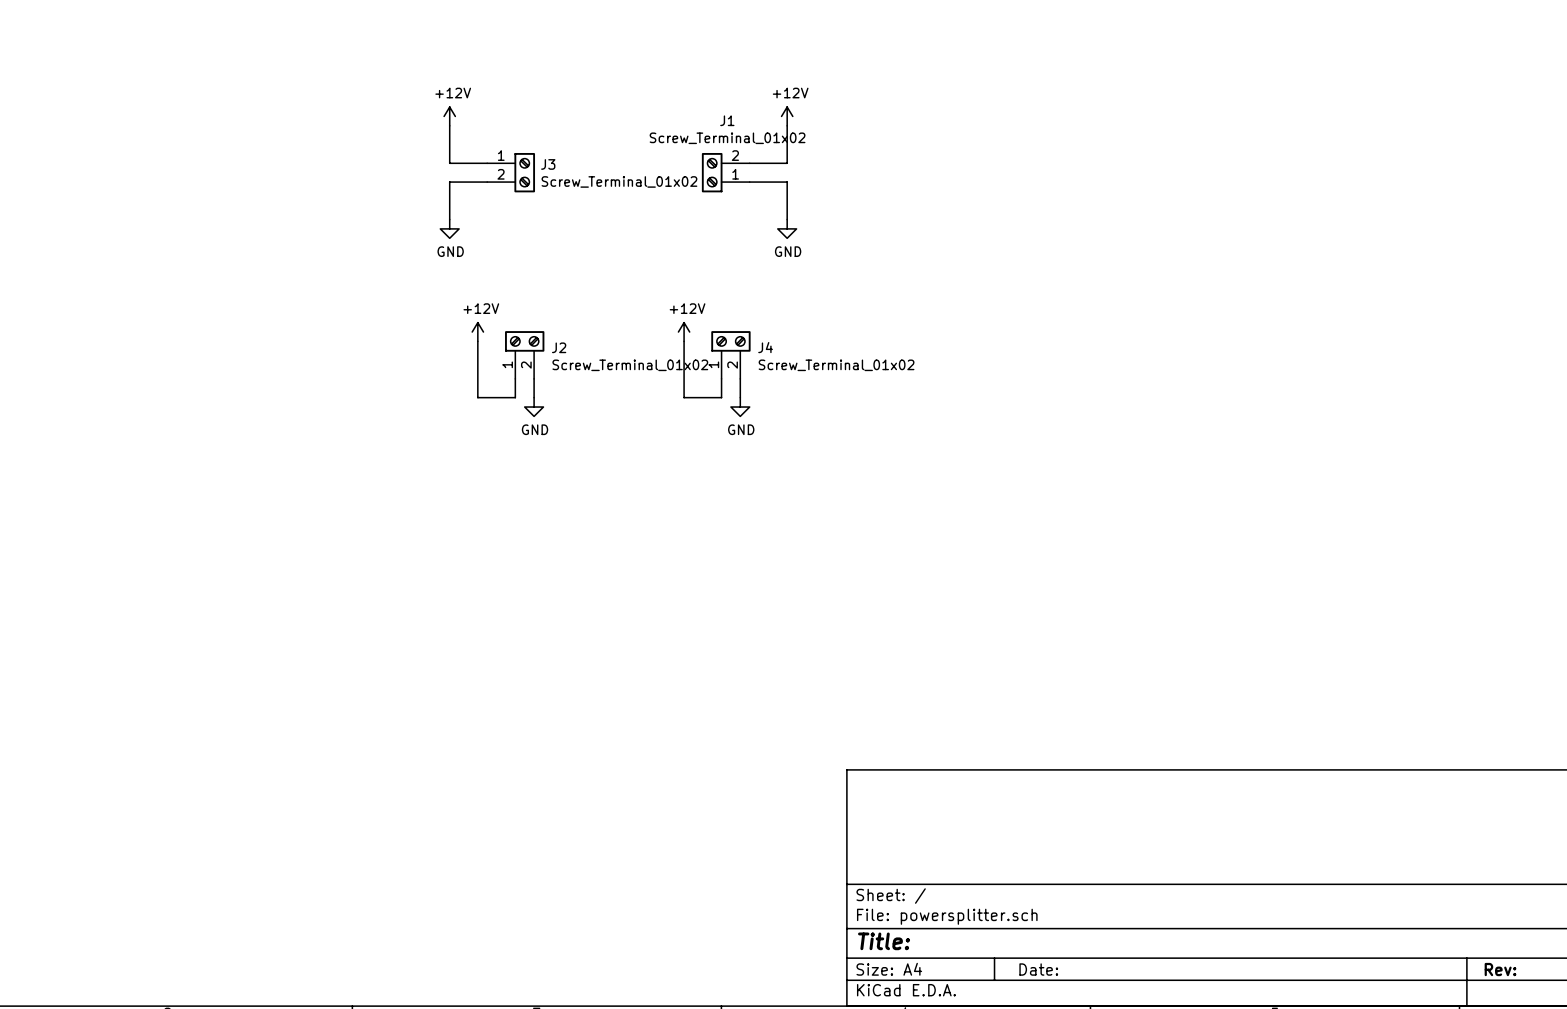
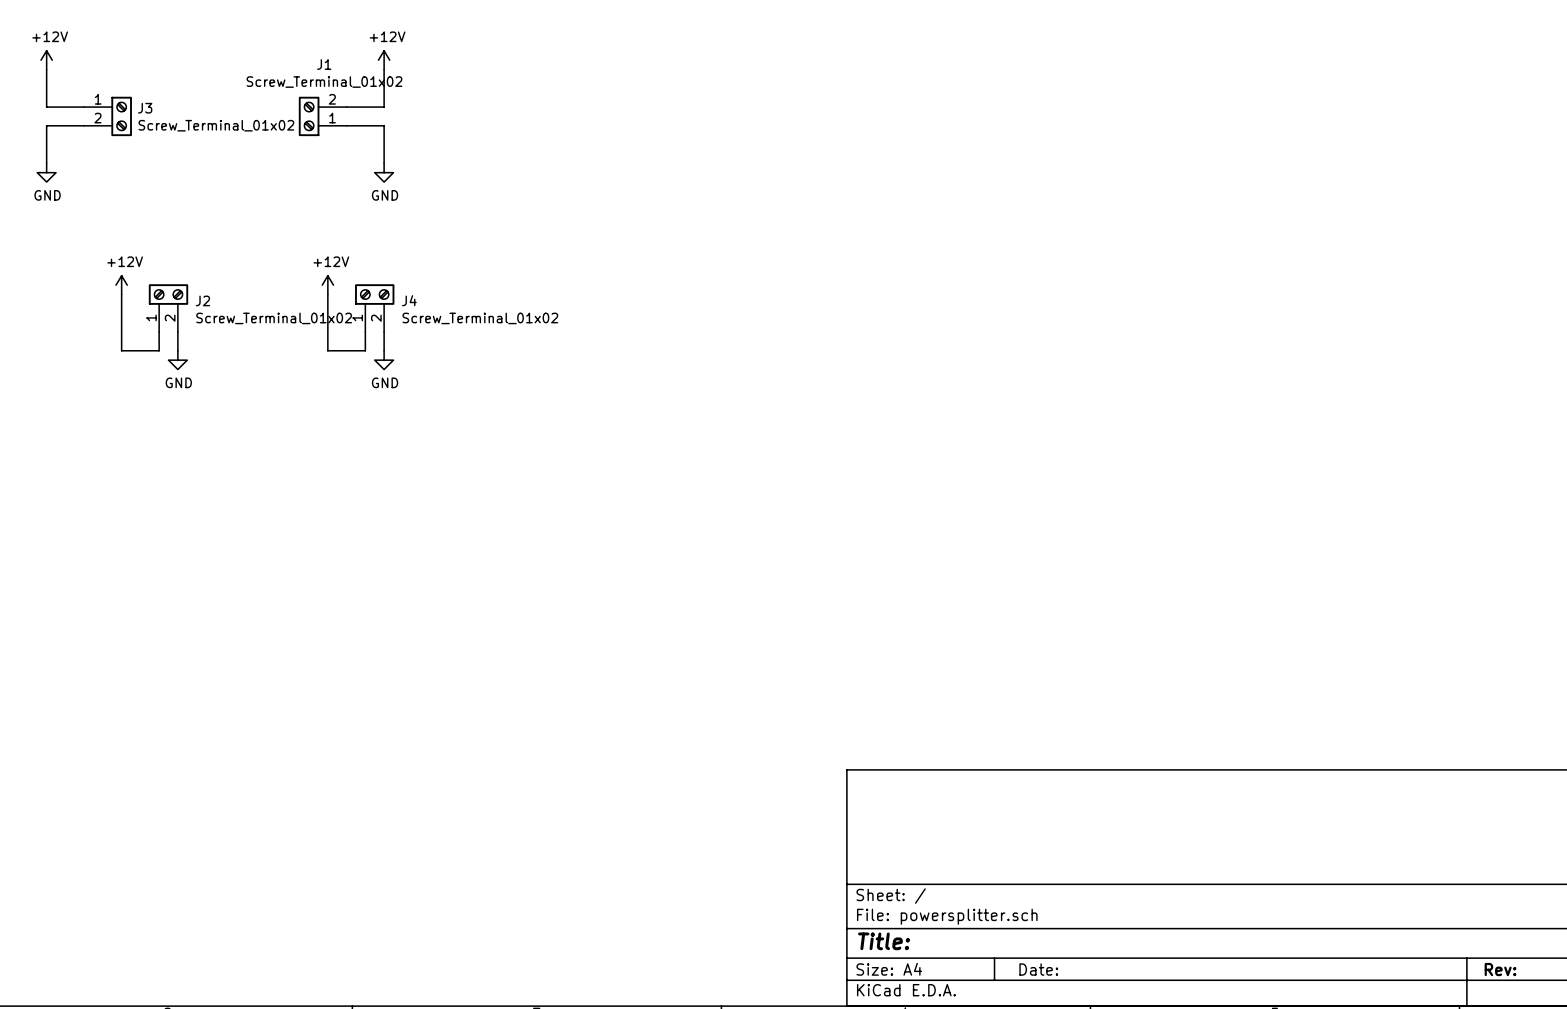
power symbol: none -> +12V (46, 60)
wire: none -> (46, 69) (46, 107) (84, 107)
wire: none -> (384, 69) (384, 107) (346, 107)
power symbol position: +12V (449, 116) -> +12V (384, 60)
power symbol: +12V (787, 116) -> none
wire: none -> (84, 125) (46, 125) (46, 163)
wire: none -> (346, 125) (384, 125) (384, 163)
wire: (449, 125) (449, 163) (487, 163) -> none
wire: (787, 125) (787, 163) (749, 163) -> none
power symbol: none -> GND (46, 172)
power symbol: none -> GND (384, 172)
J3 position: (511, 172) -> (108, 116)
J1 position: (725, 172) -> (322, 116)
wire: (487, 182) (449, 182) (449, 219) -> none
wire: (749, 182) (787, 182) (787, 219) -> none
power symbol: GND (449, 228) -> none
power symbol: GND (787, 228) -> none
power symbol: none -> +12V (121, 285)
power symbol: none -> +12V (327, 285)
wire: none -> (121, 294) (121, 350) (159, 350) (159, 332)
wire: none -> (177, 332) (177, 350)
power symbol: +12V (477, 332) -> none
power symbol: +12V (684, 332) -> none
wire: (477, 341) (477, 397) (515, 397) (515, 378) -> (327, 294) (327, 350) (365, 350) (365, 332)
wire: (684, 341) (684, 397) (721, 397) (721, 378) -> none
J2 position: (524, 354) -> (168, 308)
J4 position: (730, 354) -> (374, 308)
power symbol: none -> GND (177, 360)
power symbol: none -> GND (384, 360)
wire: (534, 378) (534, 397) -> (384, 332) (384, 350)
wire: (740, 378) (740, 397) -> none
power symbol: GND (534, 407) -> none
power symbol: GND (740, 407) -> none

